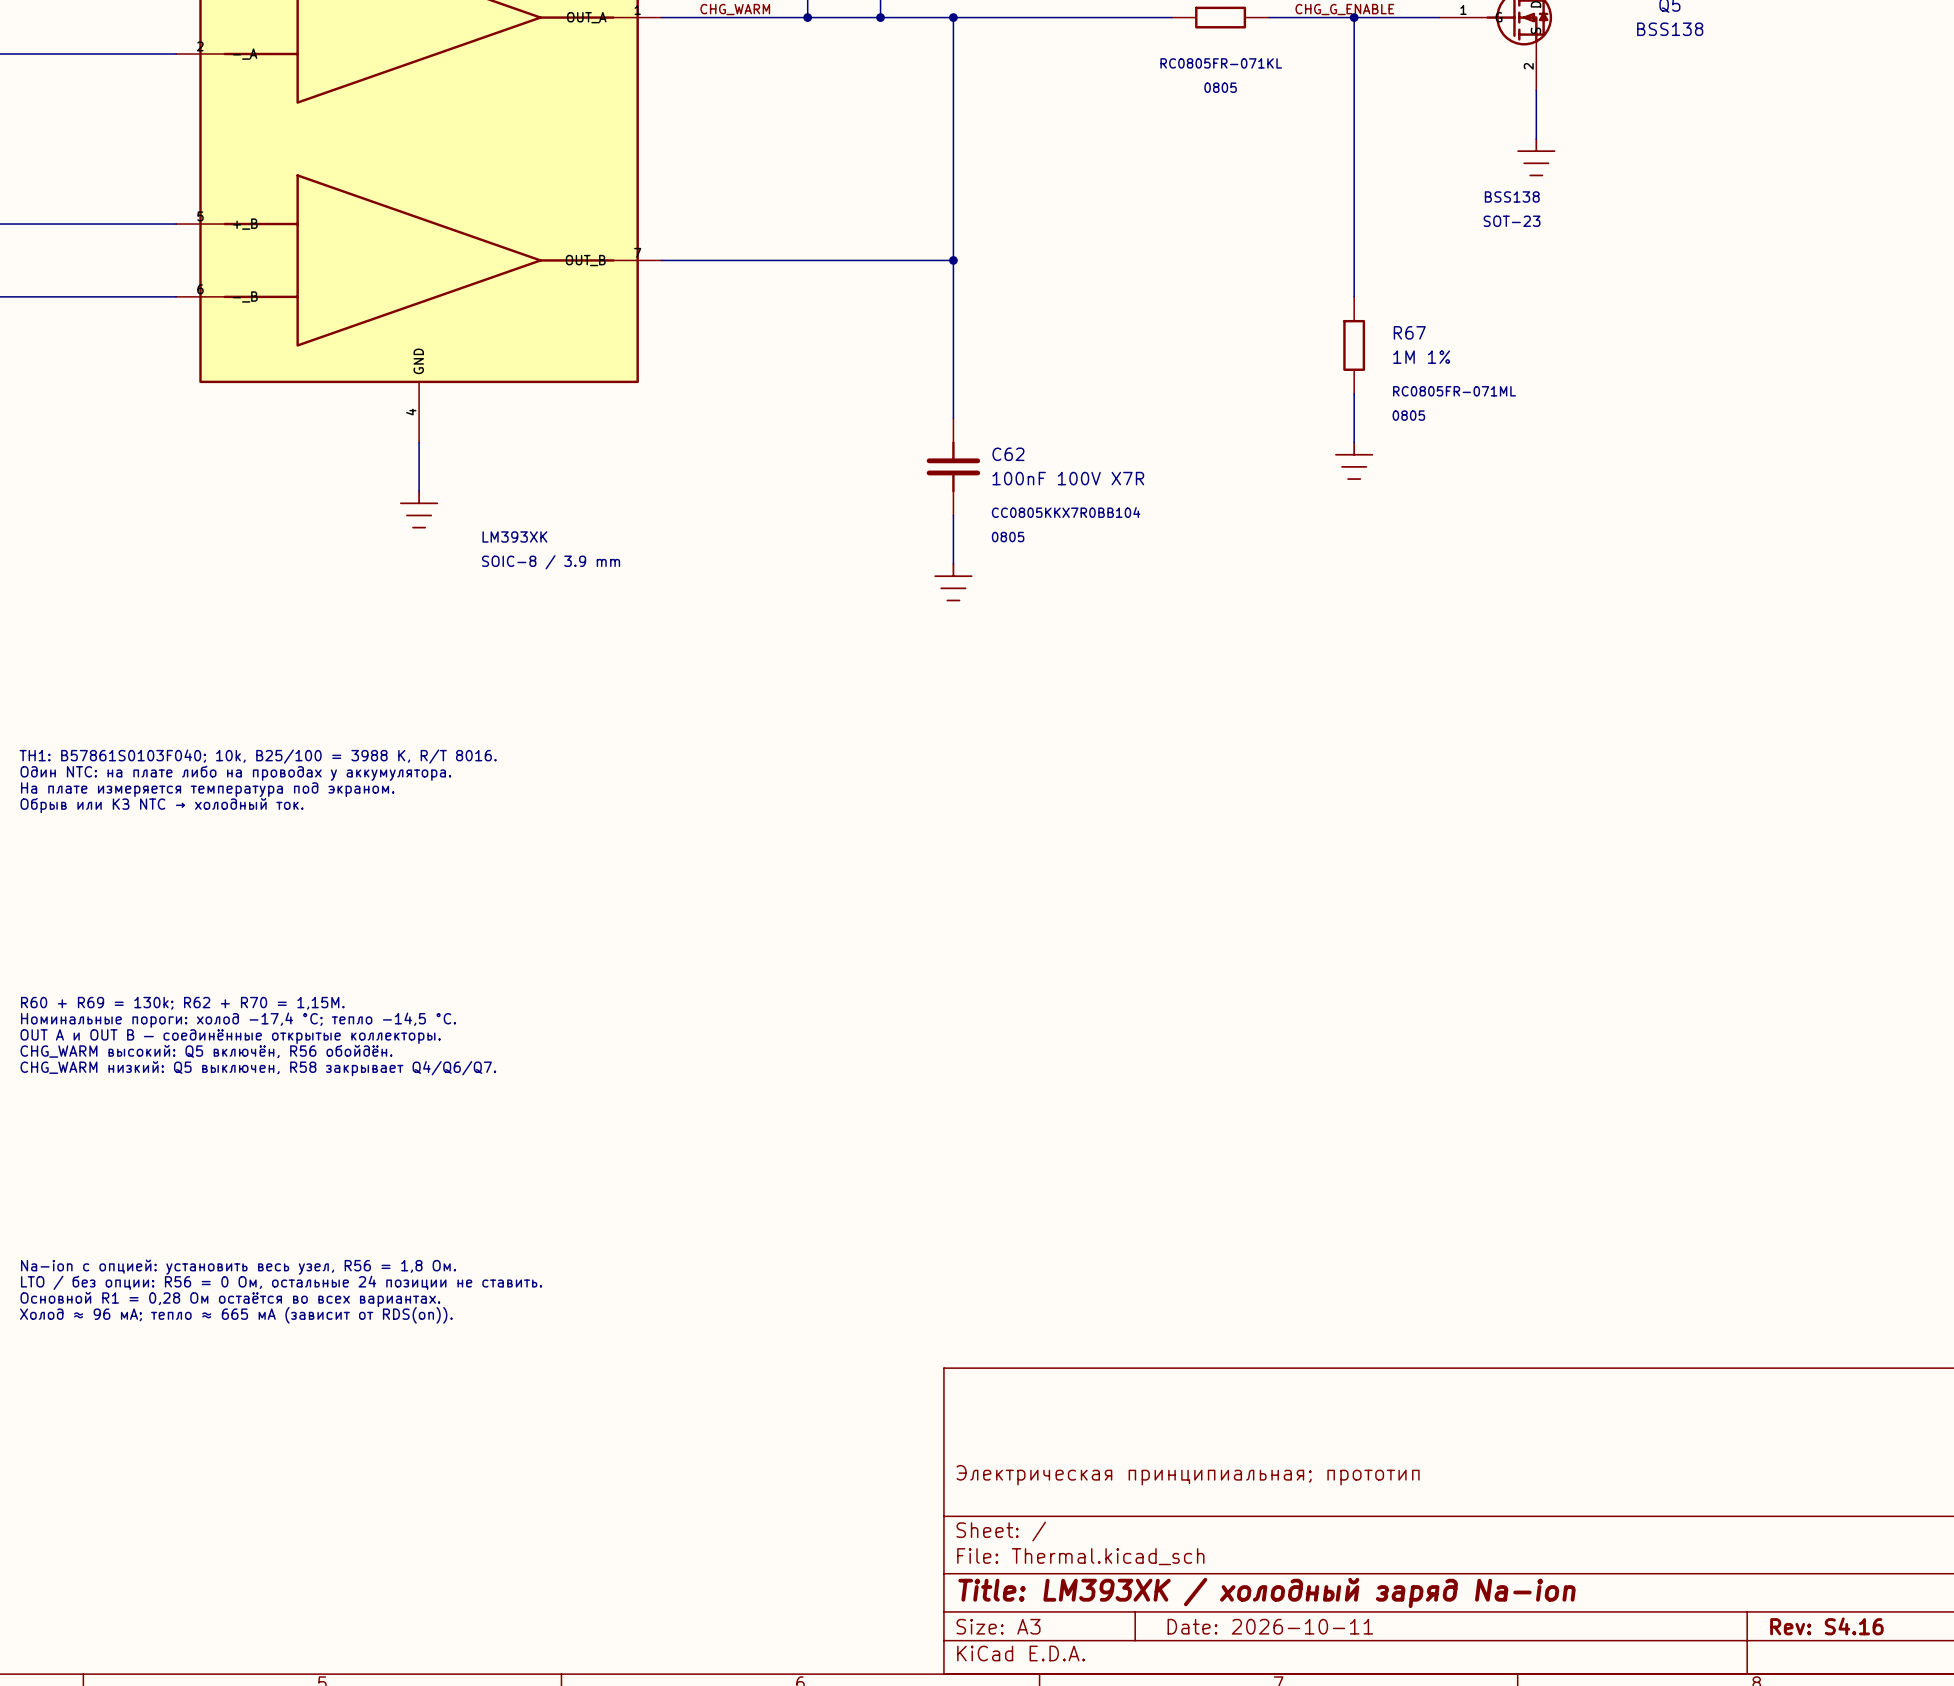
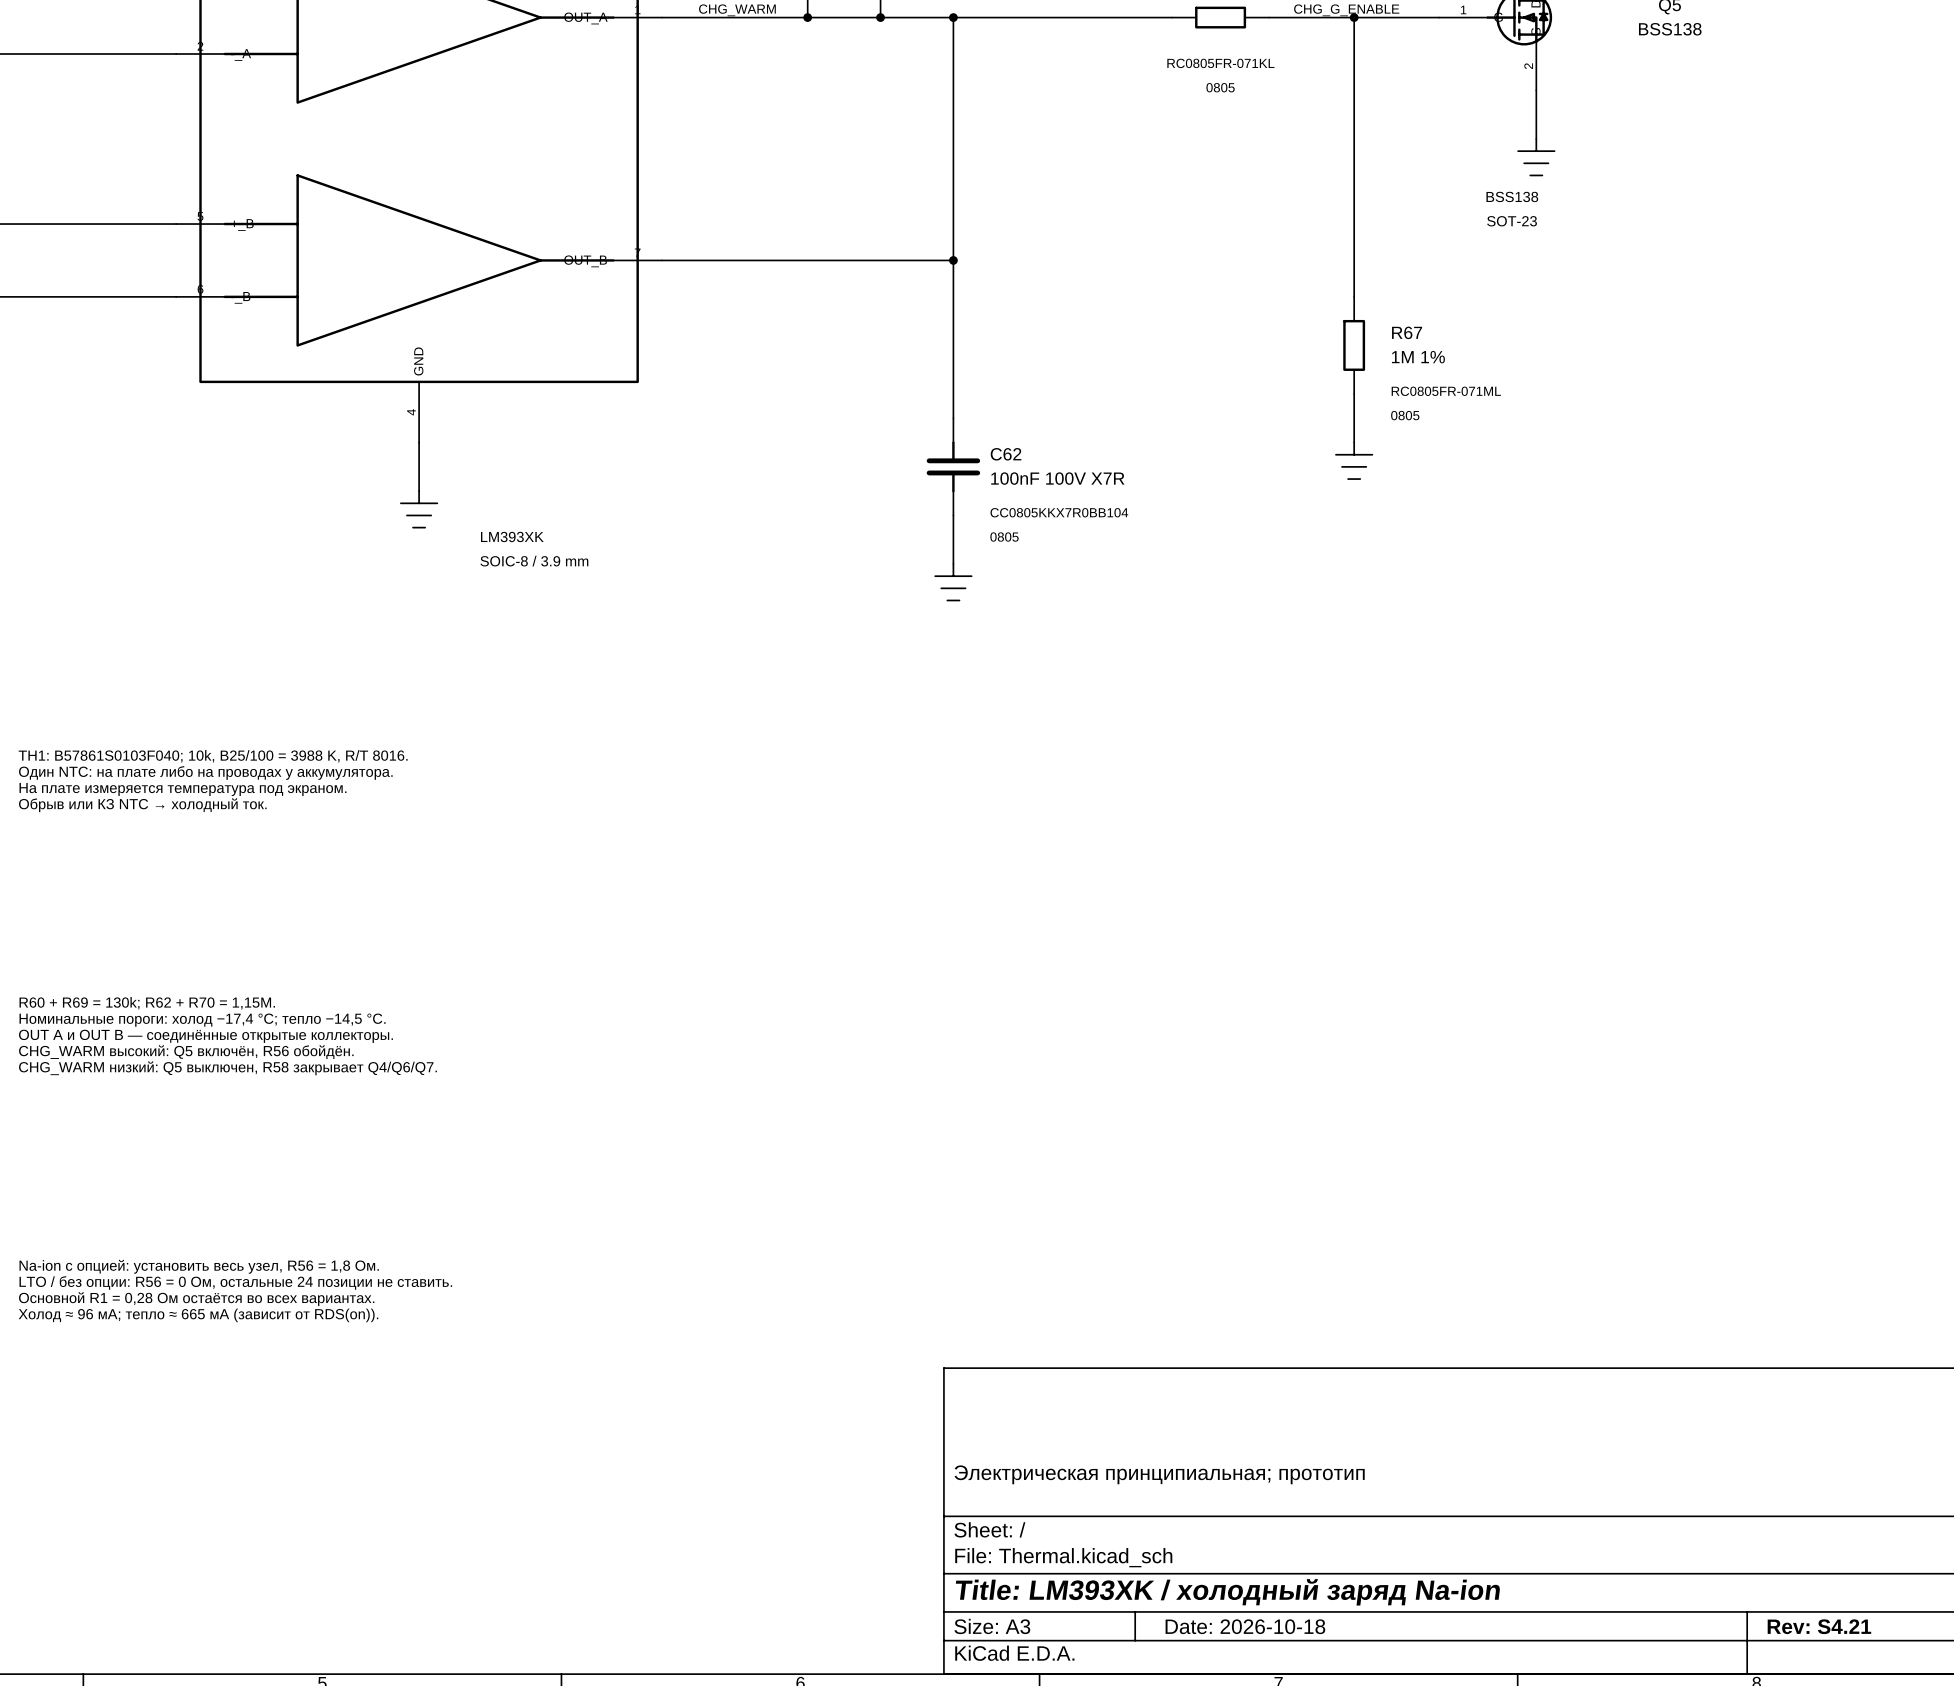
title block: Date: 2026-10-11 (1270, 1626) -> Date: 2026-10-18 (1245, 1626)
title block: Rev: S4.16 (1826, 1626) -> Rev: S4.21 (1819, 1626)

